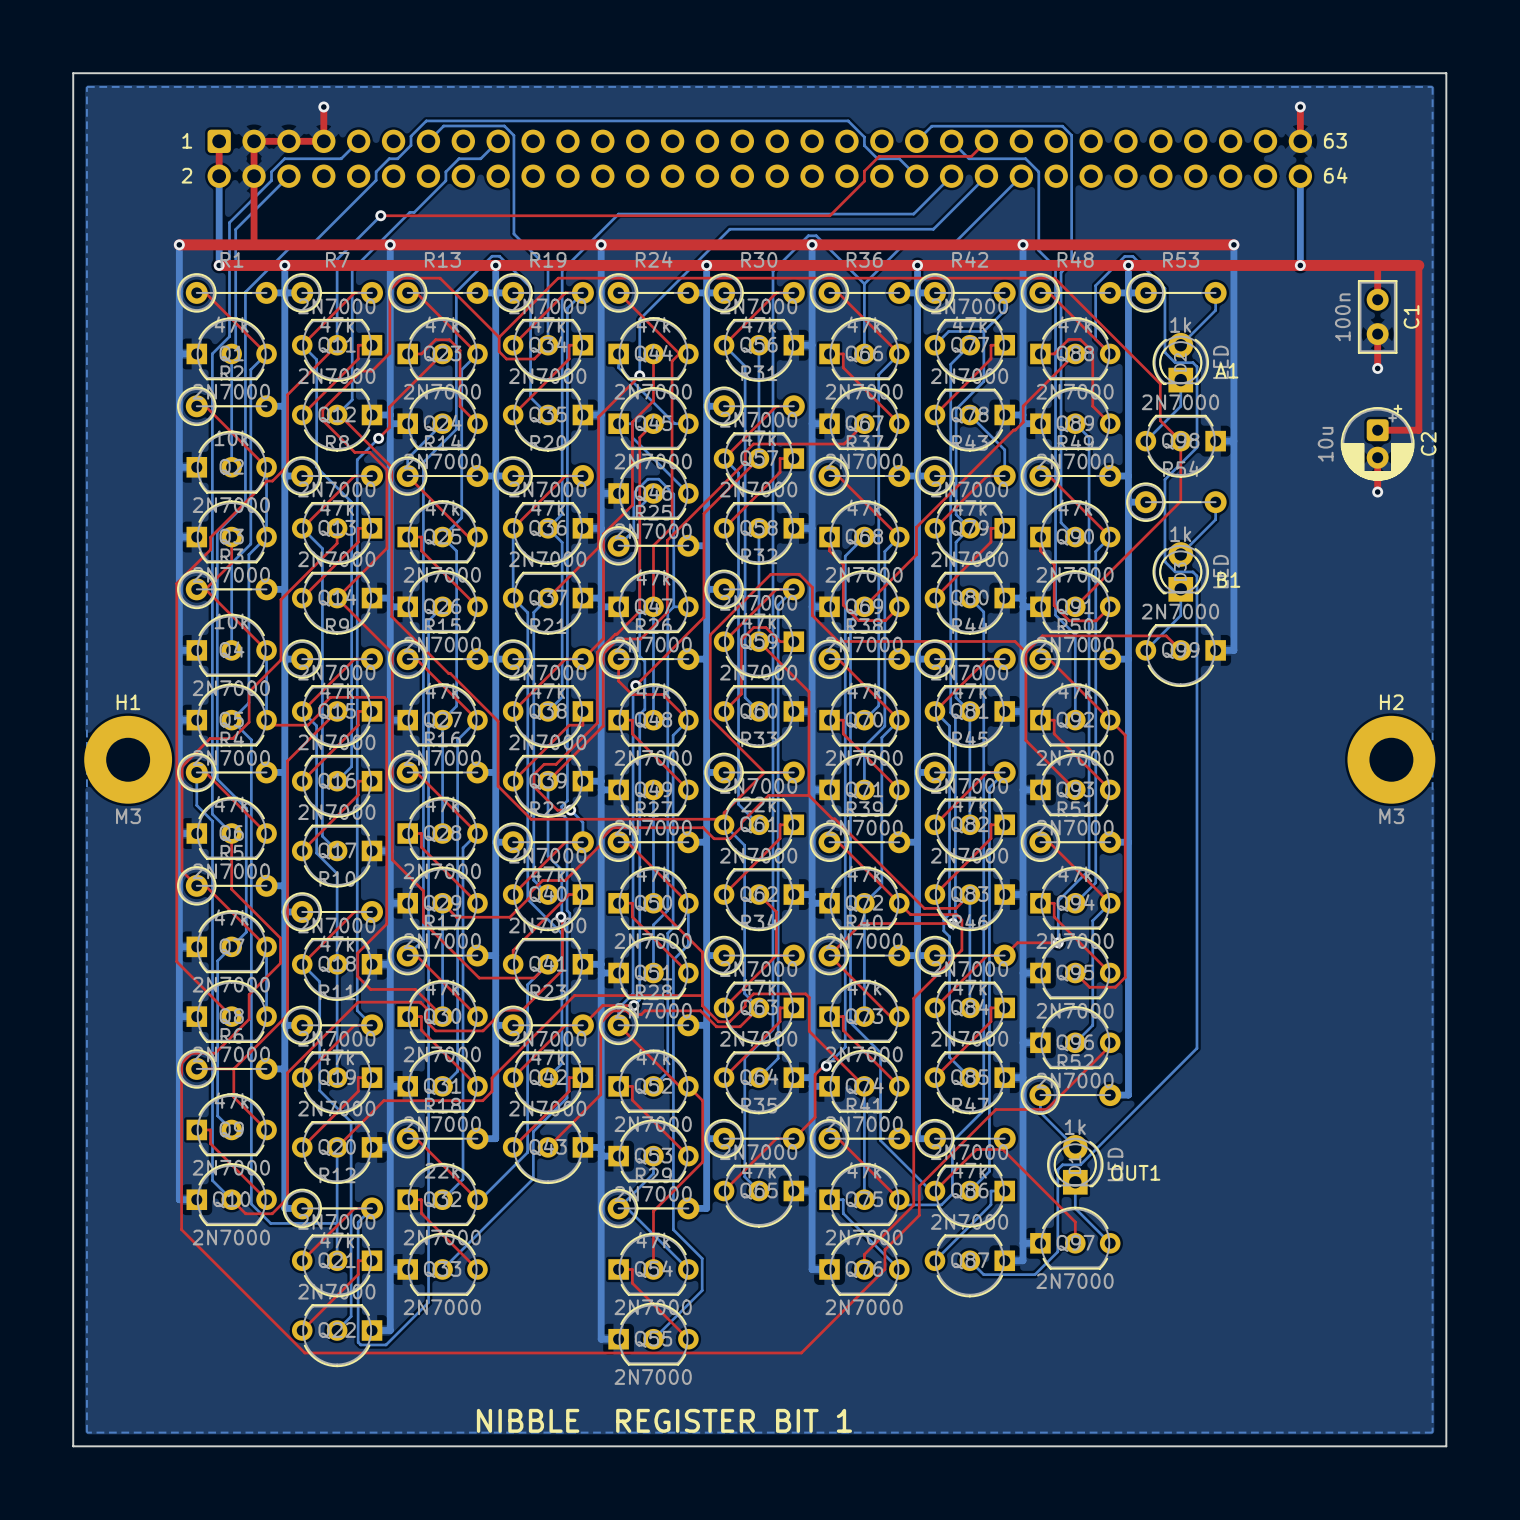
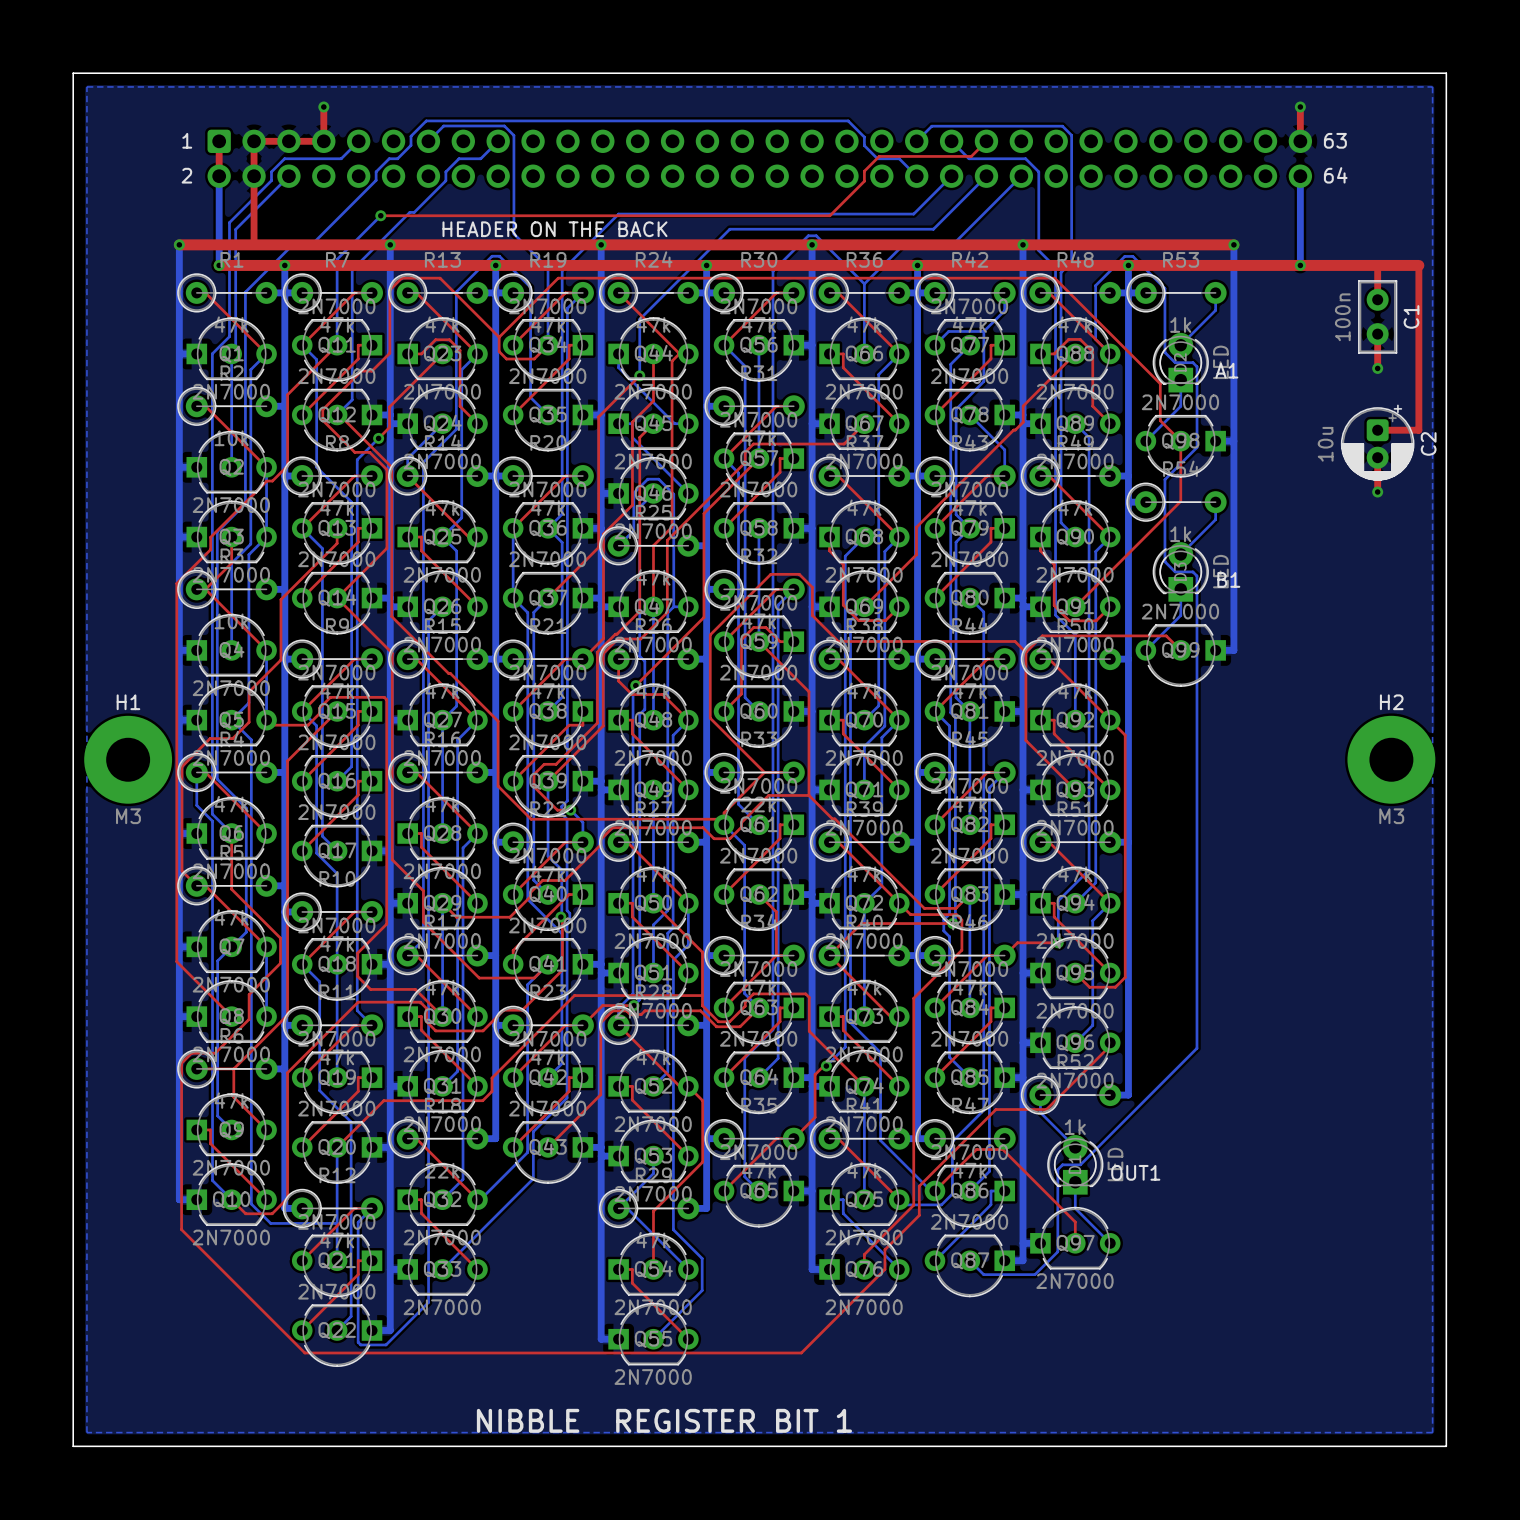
text: none -> HEADER ON THE BACK (554, 229)

